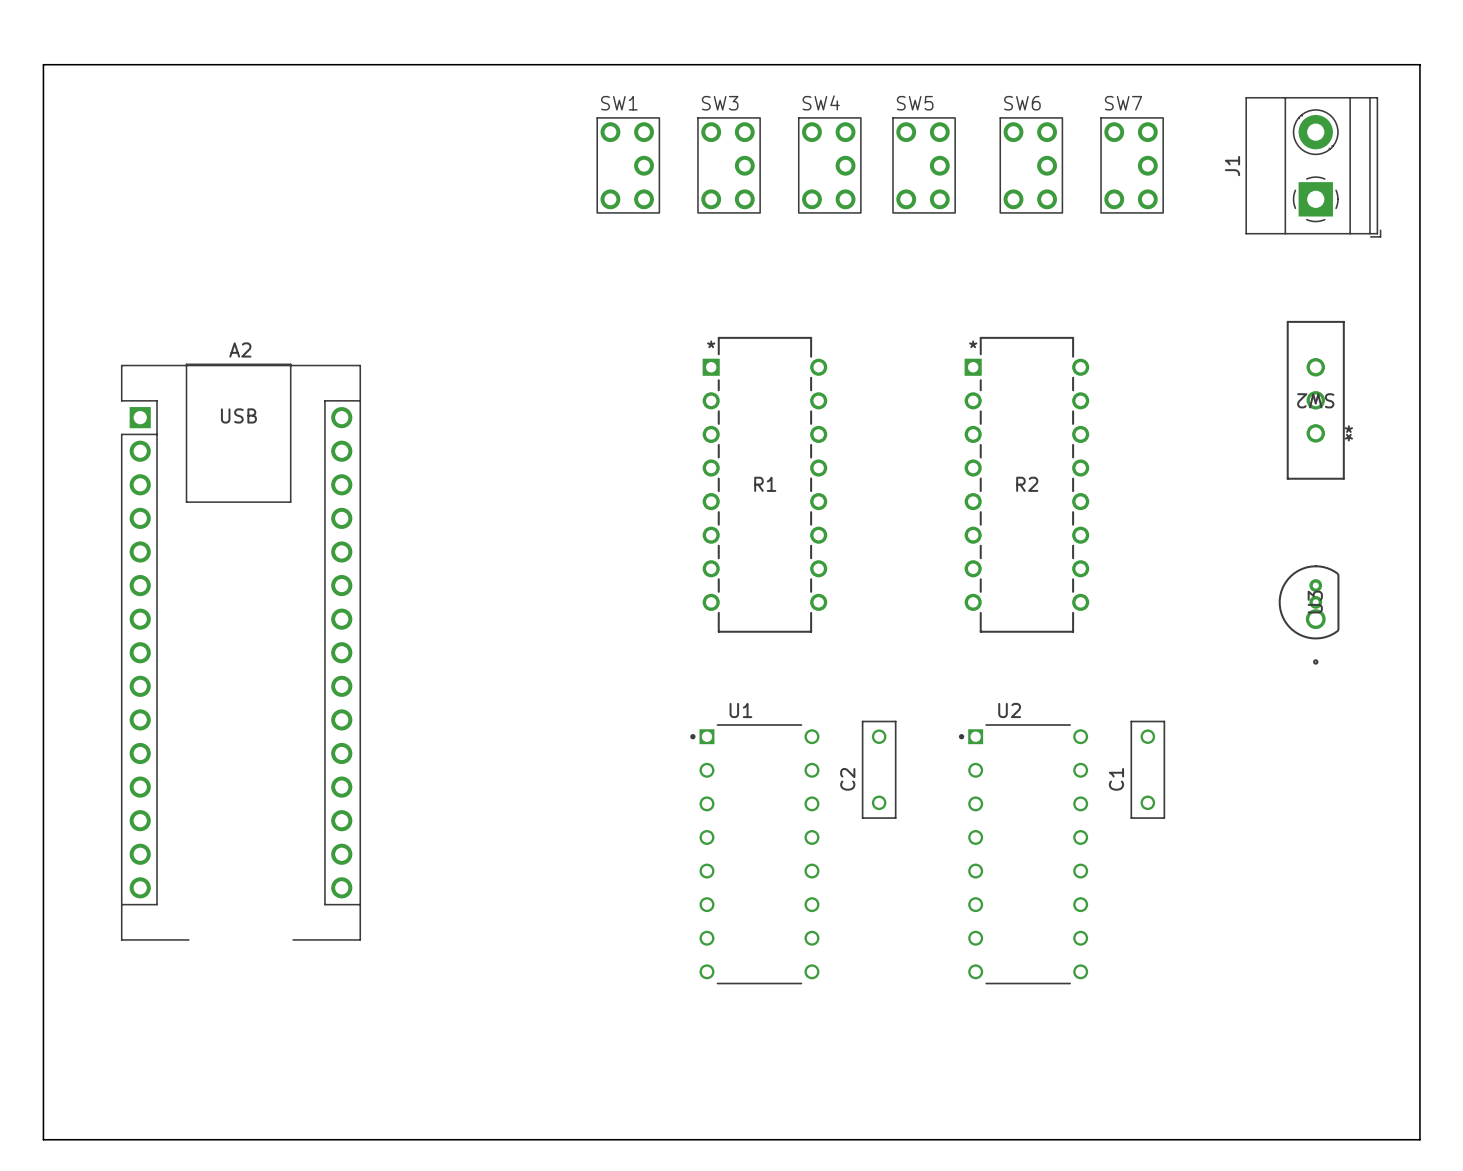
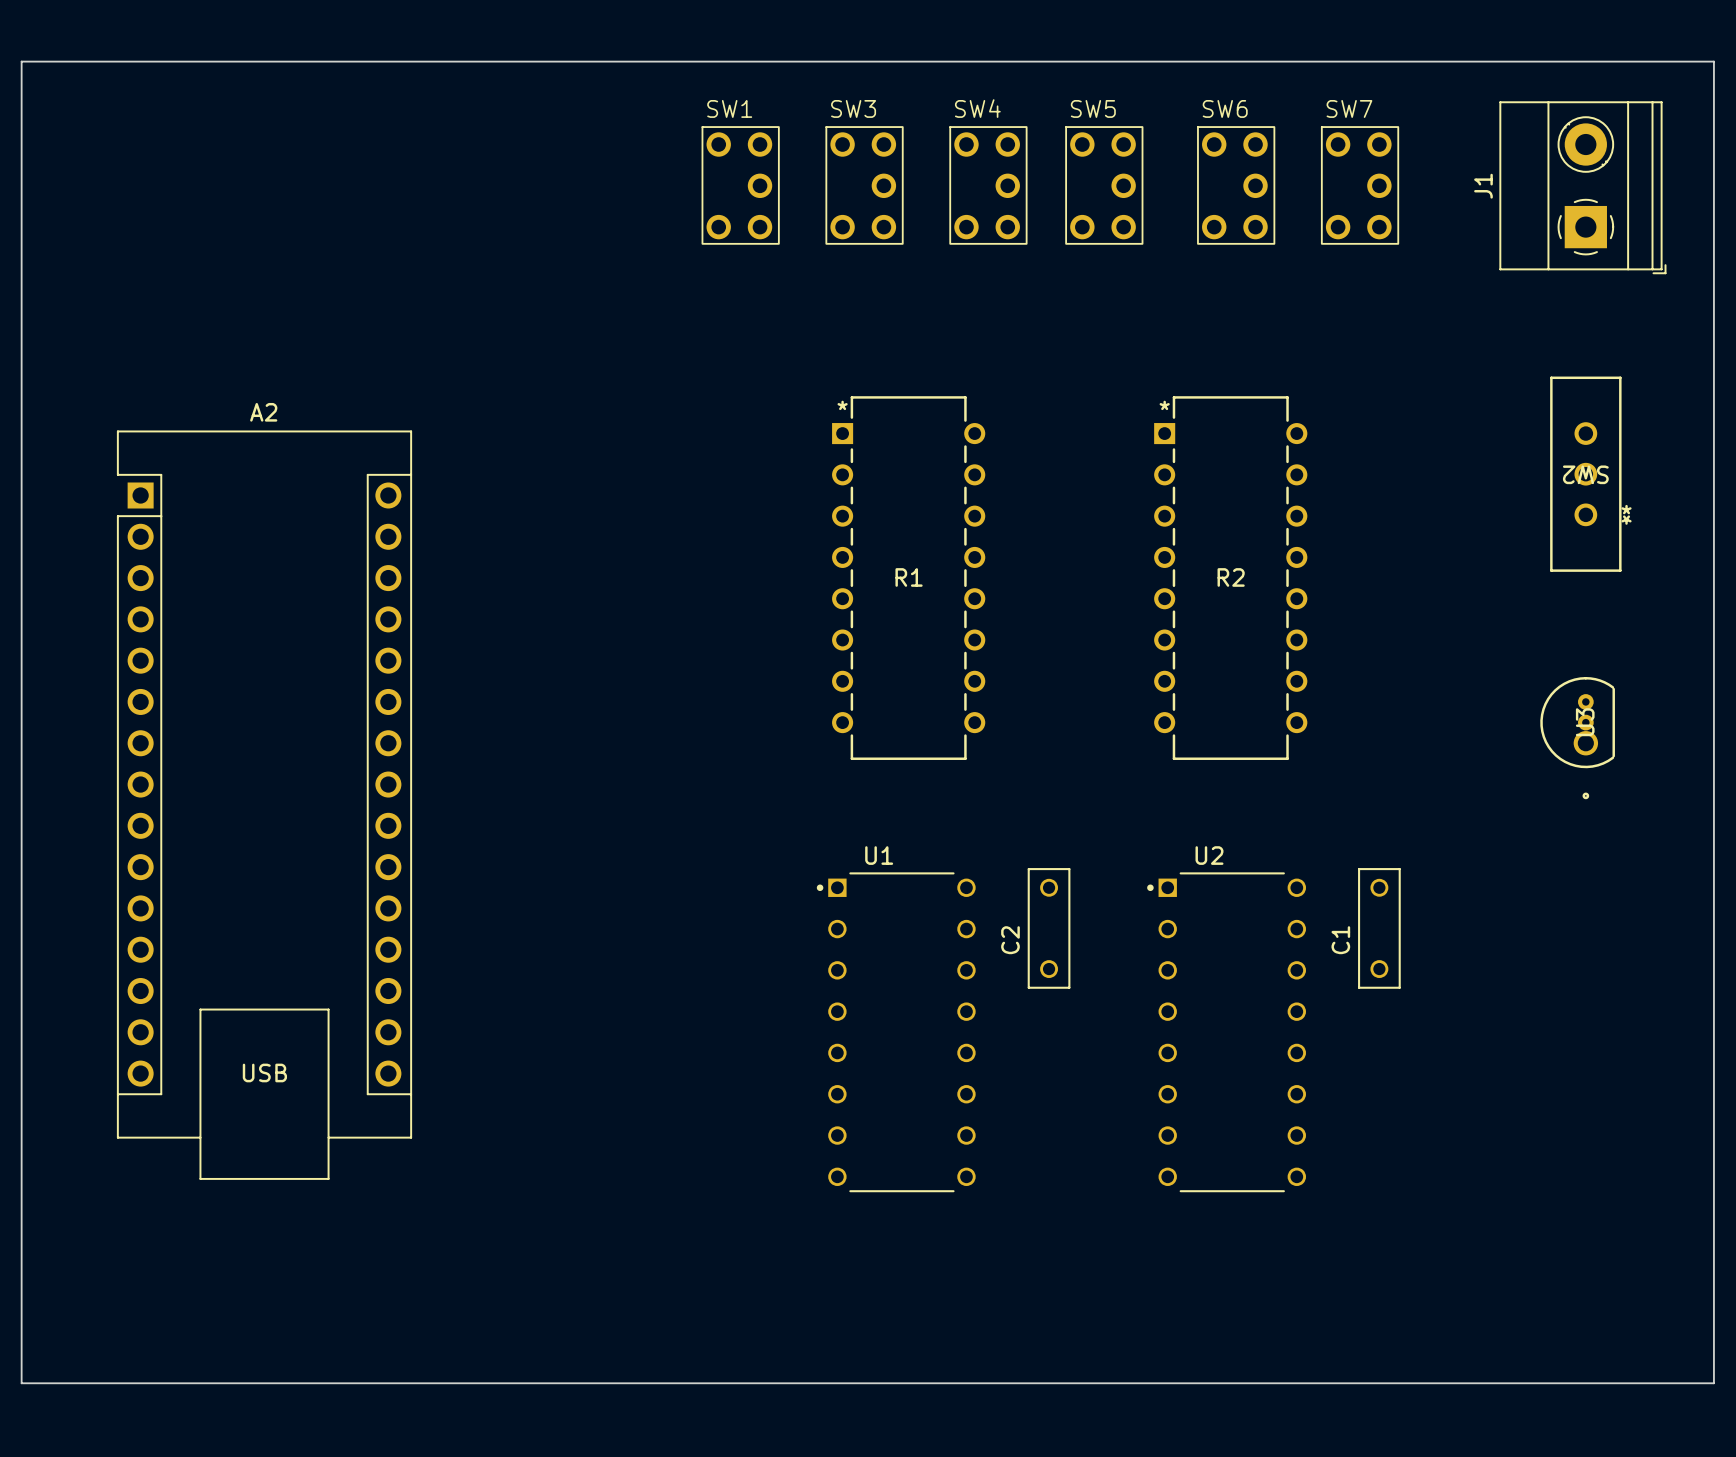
A2 footprint: [120, 363, 362, 941] -> [116, 430, 413, 1180]

